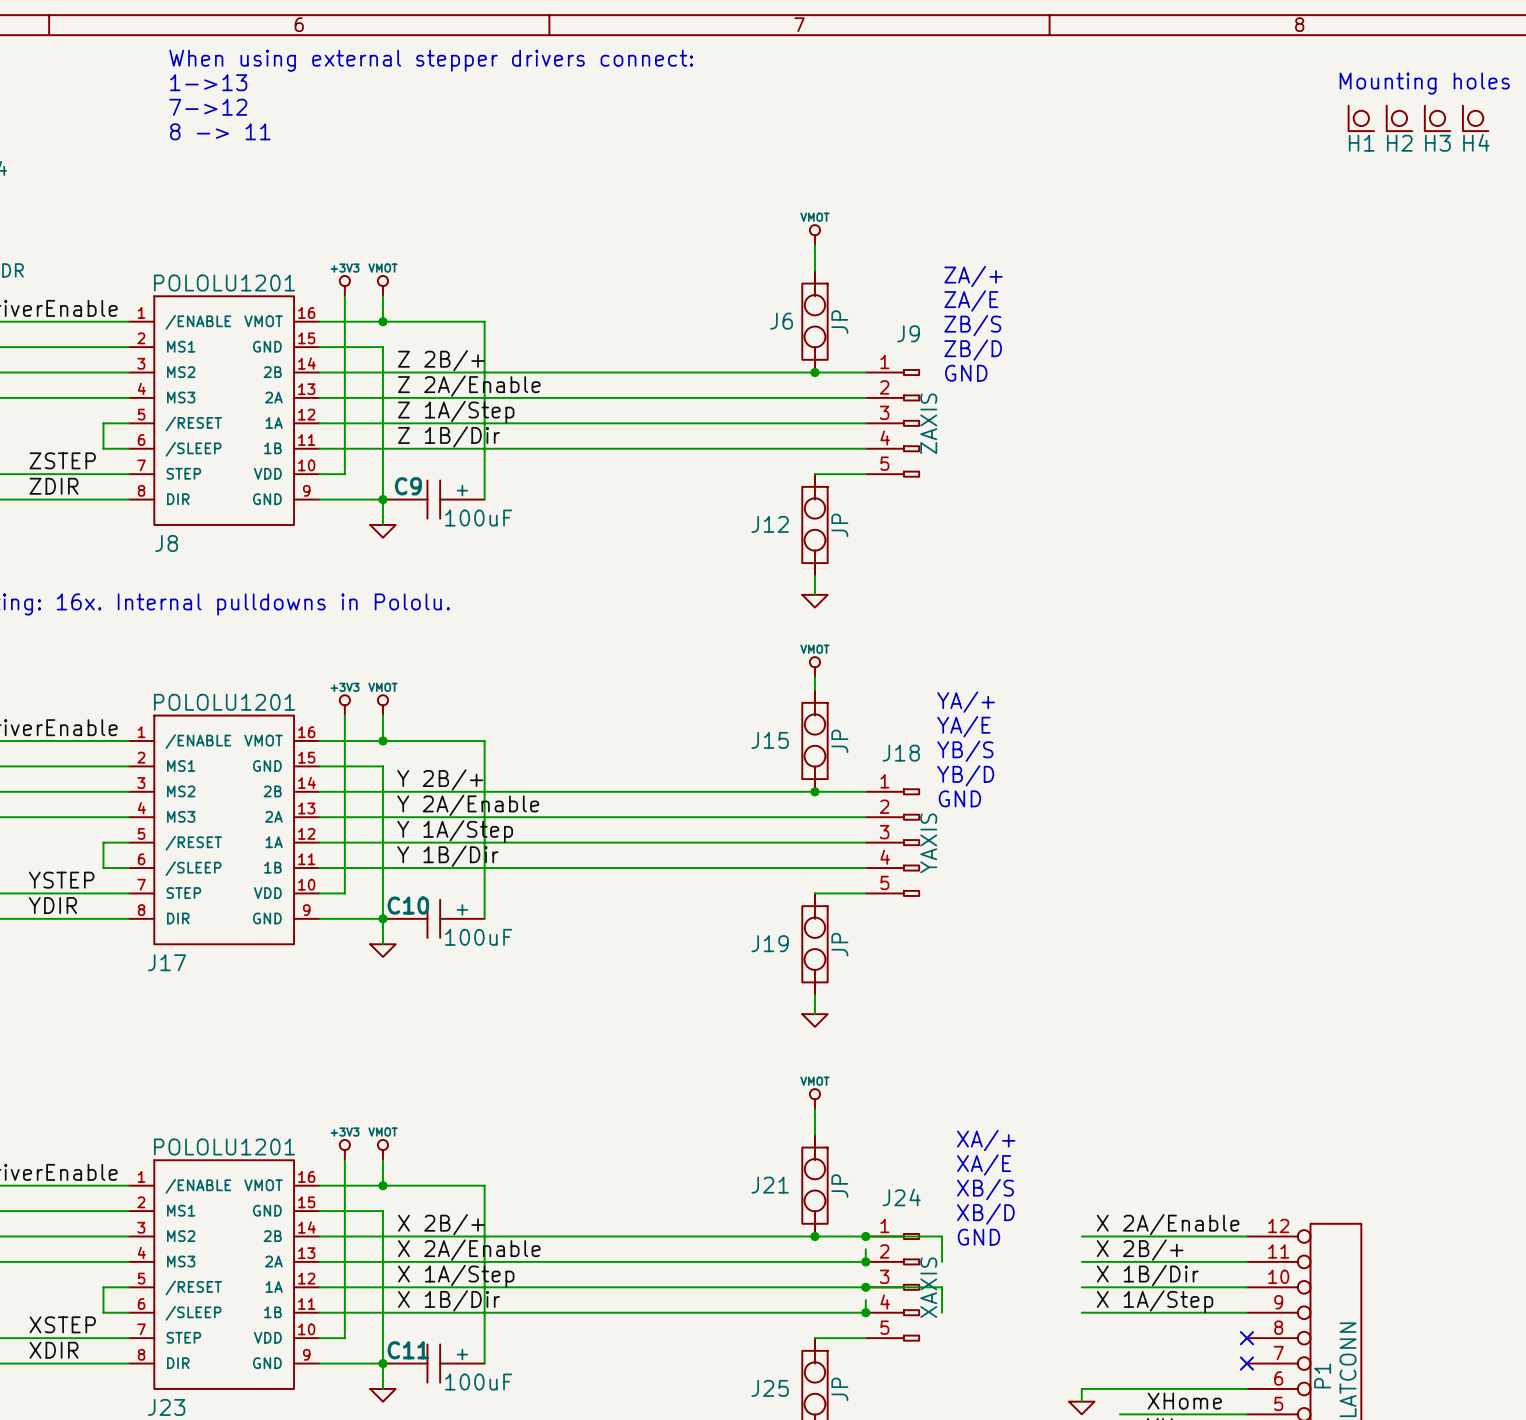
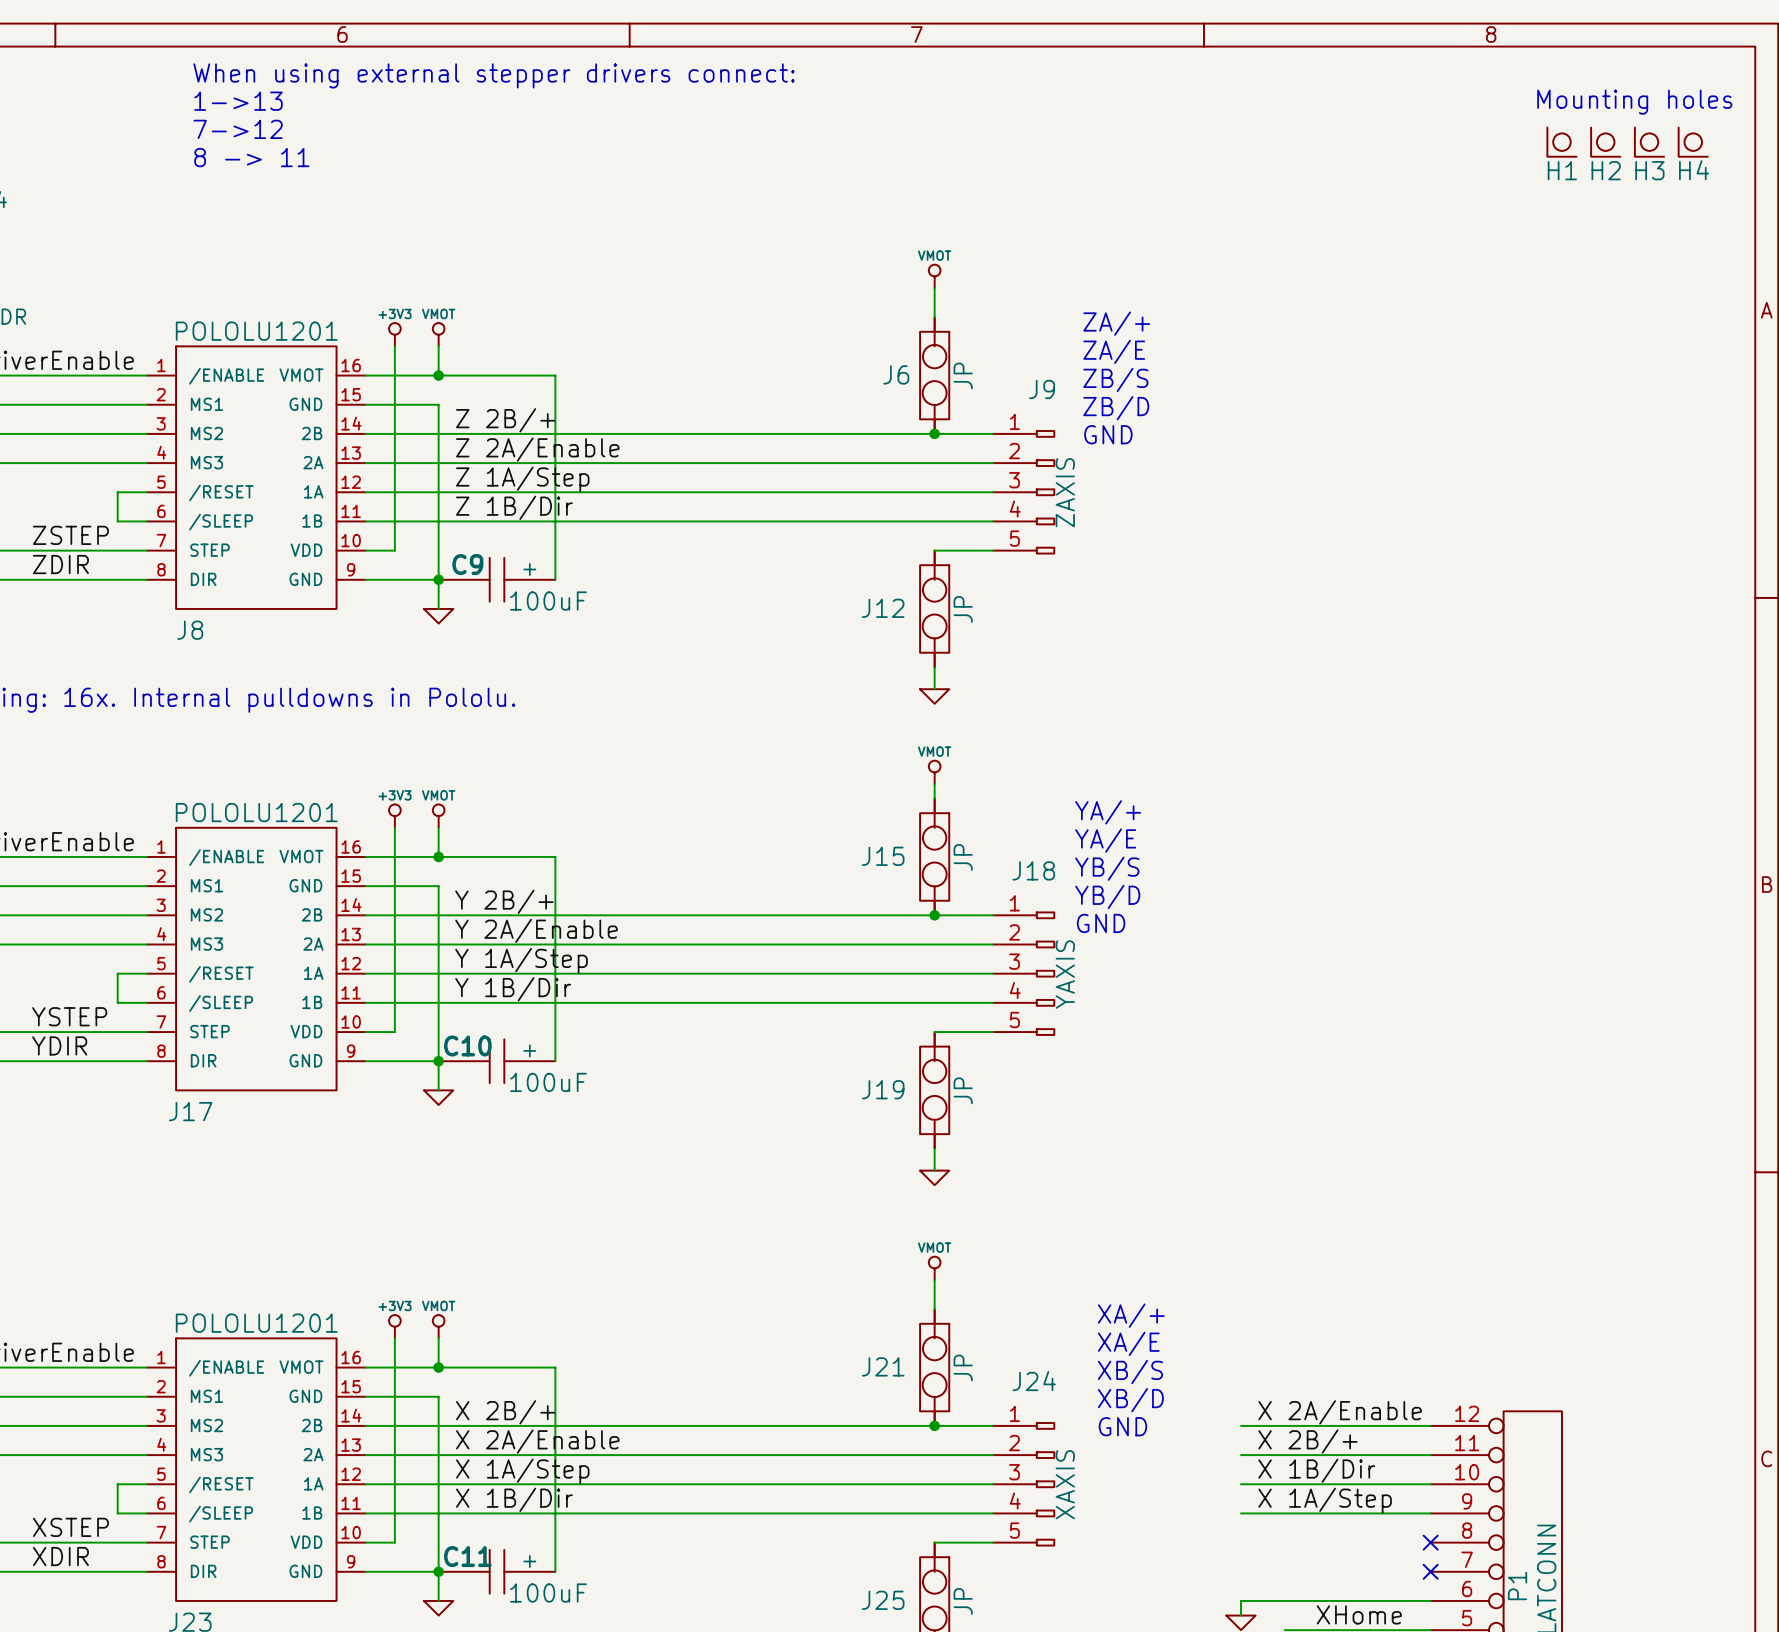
wire: (865, 1236) (942, 1236) (942, 1261) -> none
junction: (865, 1236) -> none
wire: (865, 1249) (865, 1261) -> none
junction: (865, 1261) -> none
wire: (865, 1287) (942, 1287) (942, 1312) -> none
junction: (865, 1287) -> none
wire: (865, 1300) (865, 1312) -> none
junction: (865, 1312) -> none

